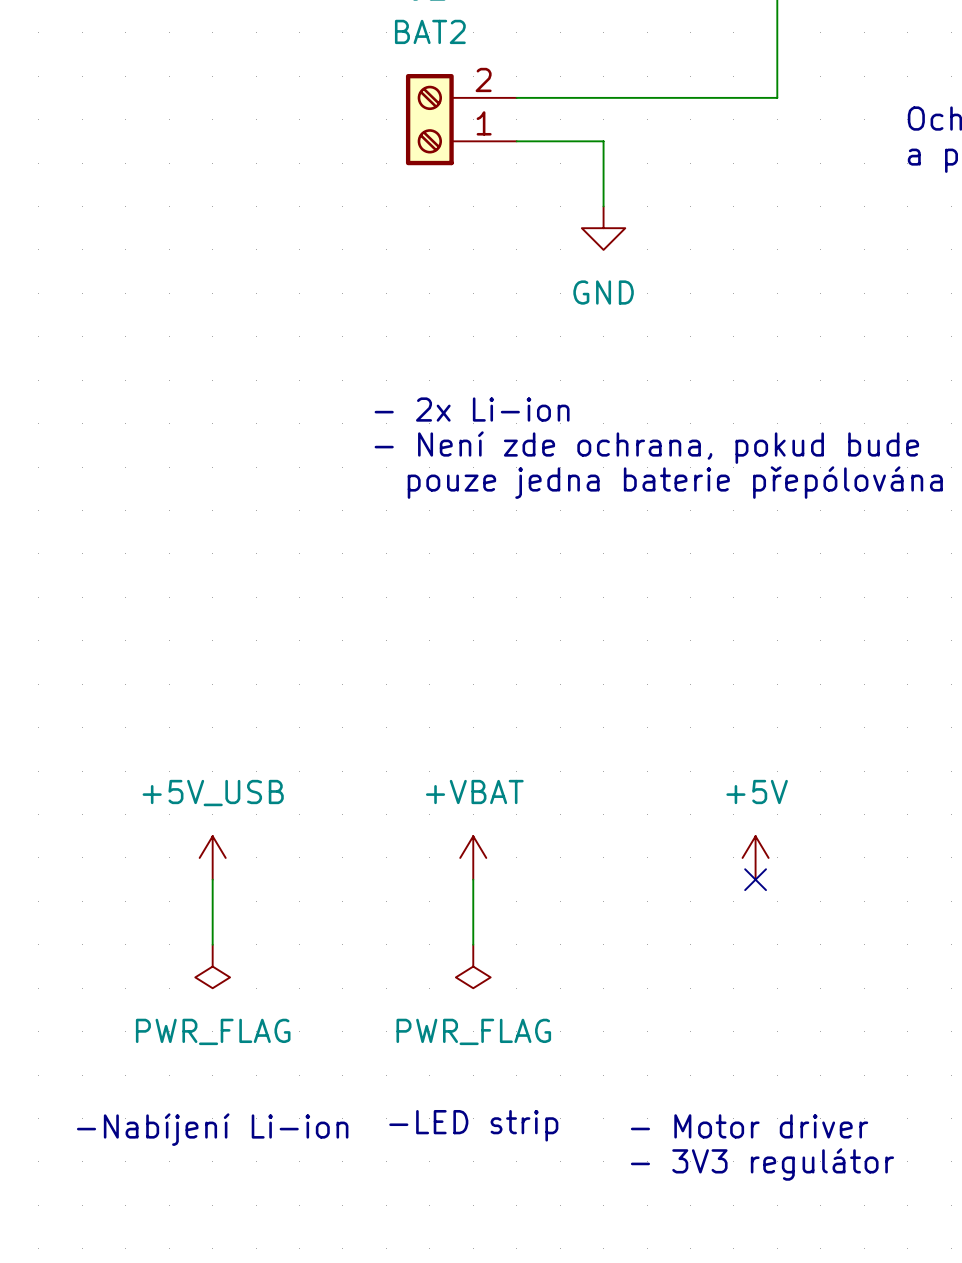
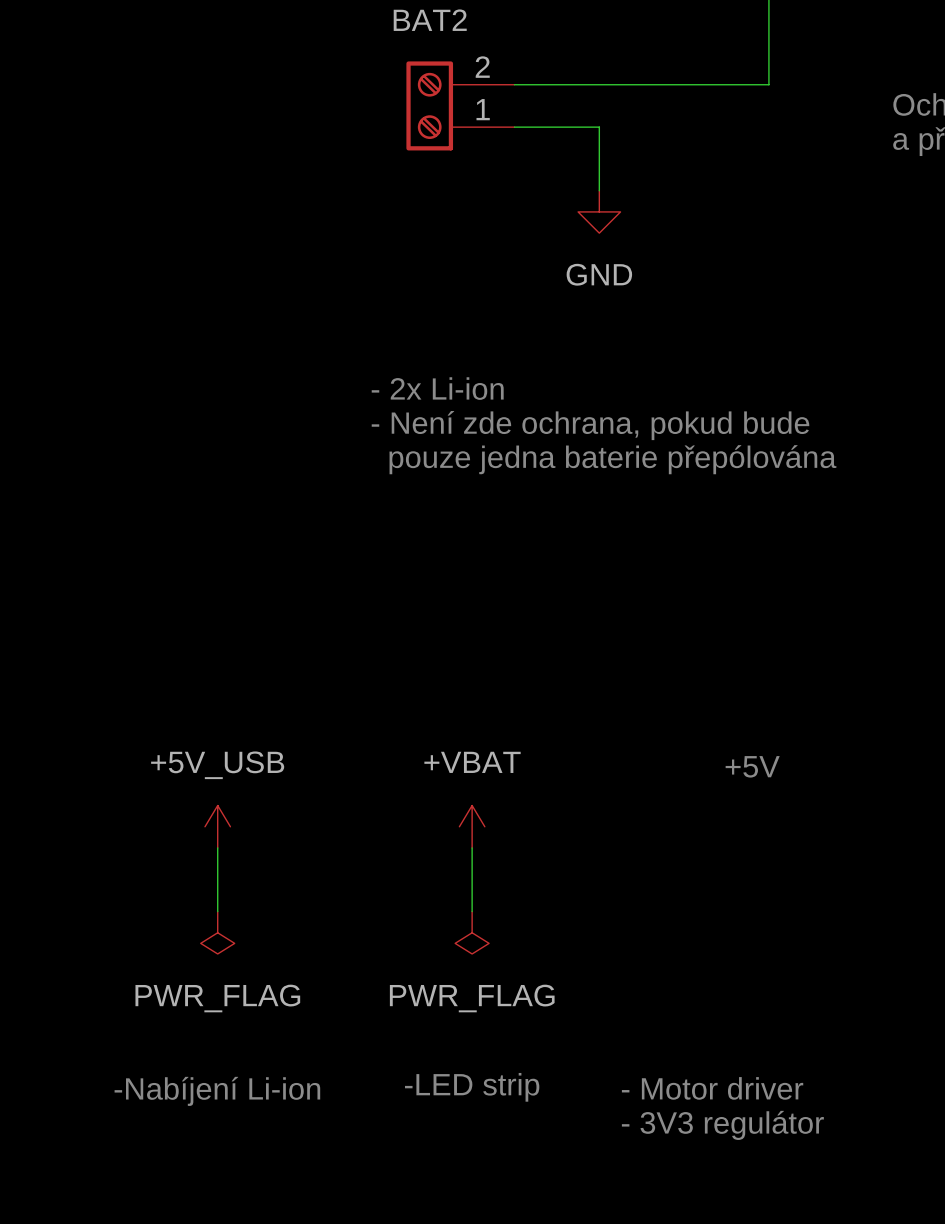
text: none -> +5V (752, 766)
power symbol: +5V (755, 857) -> none
no-connect mark: (755, 879) -> none

